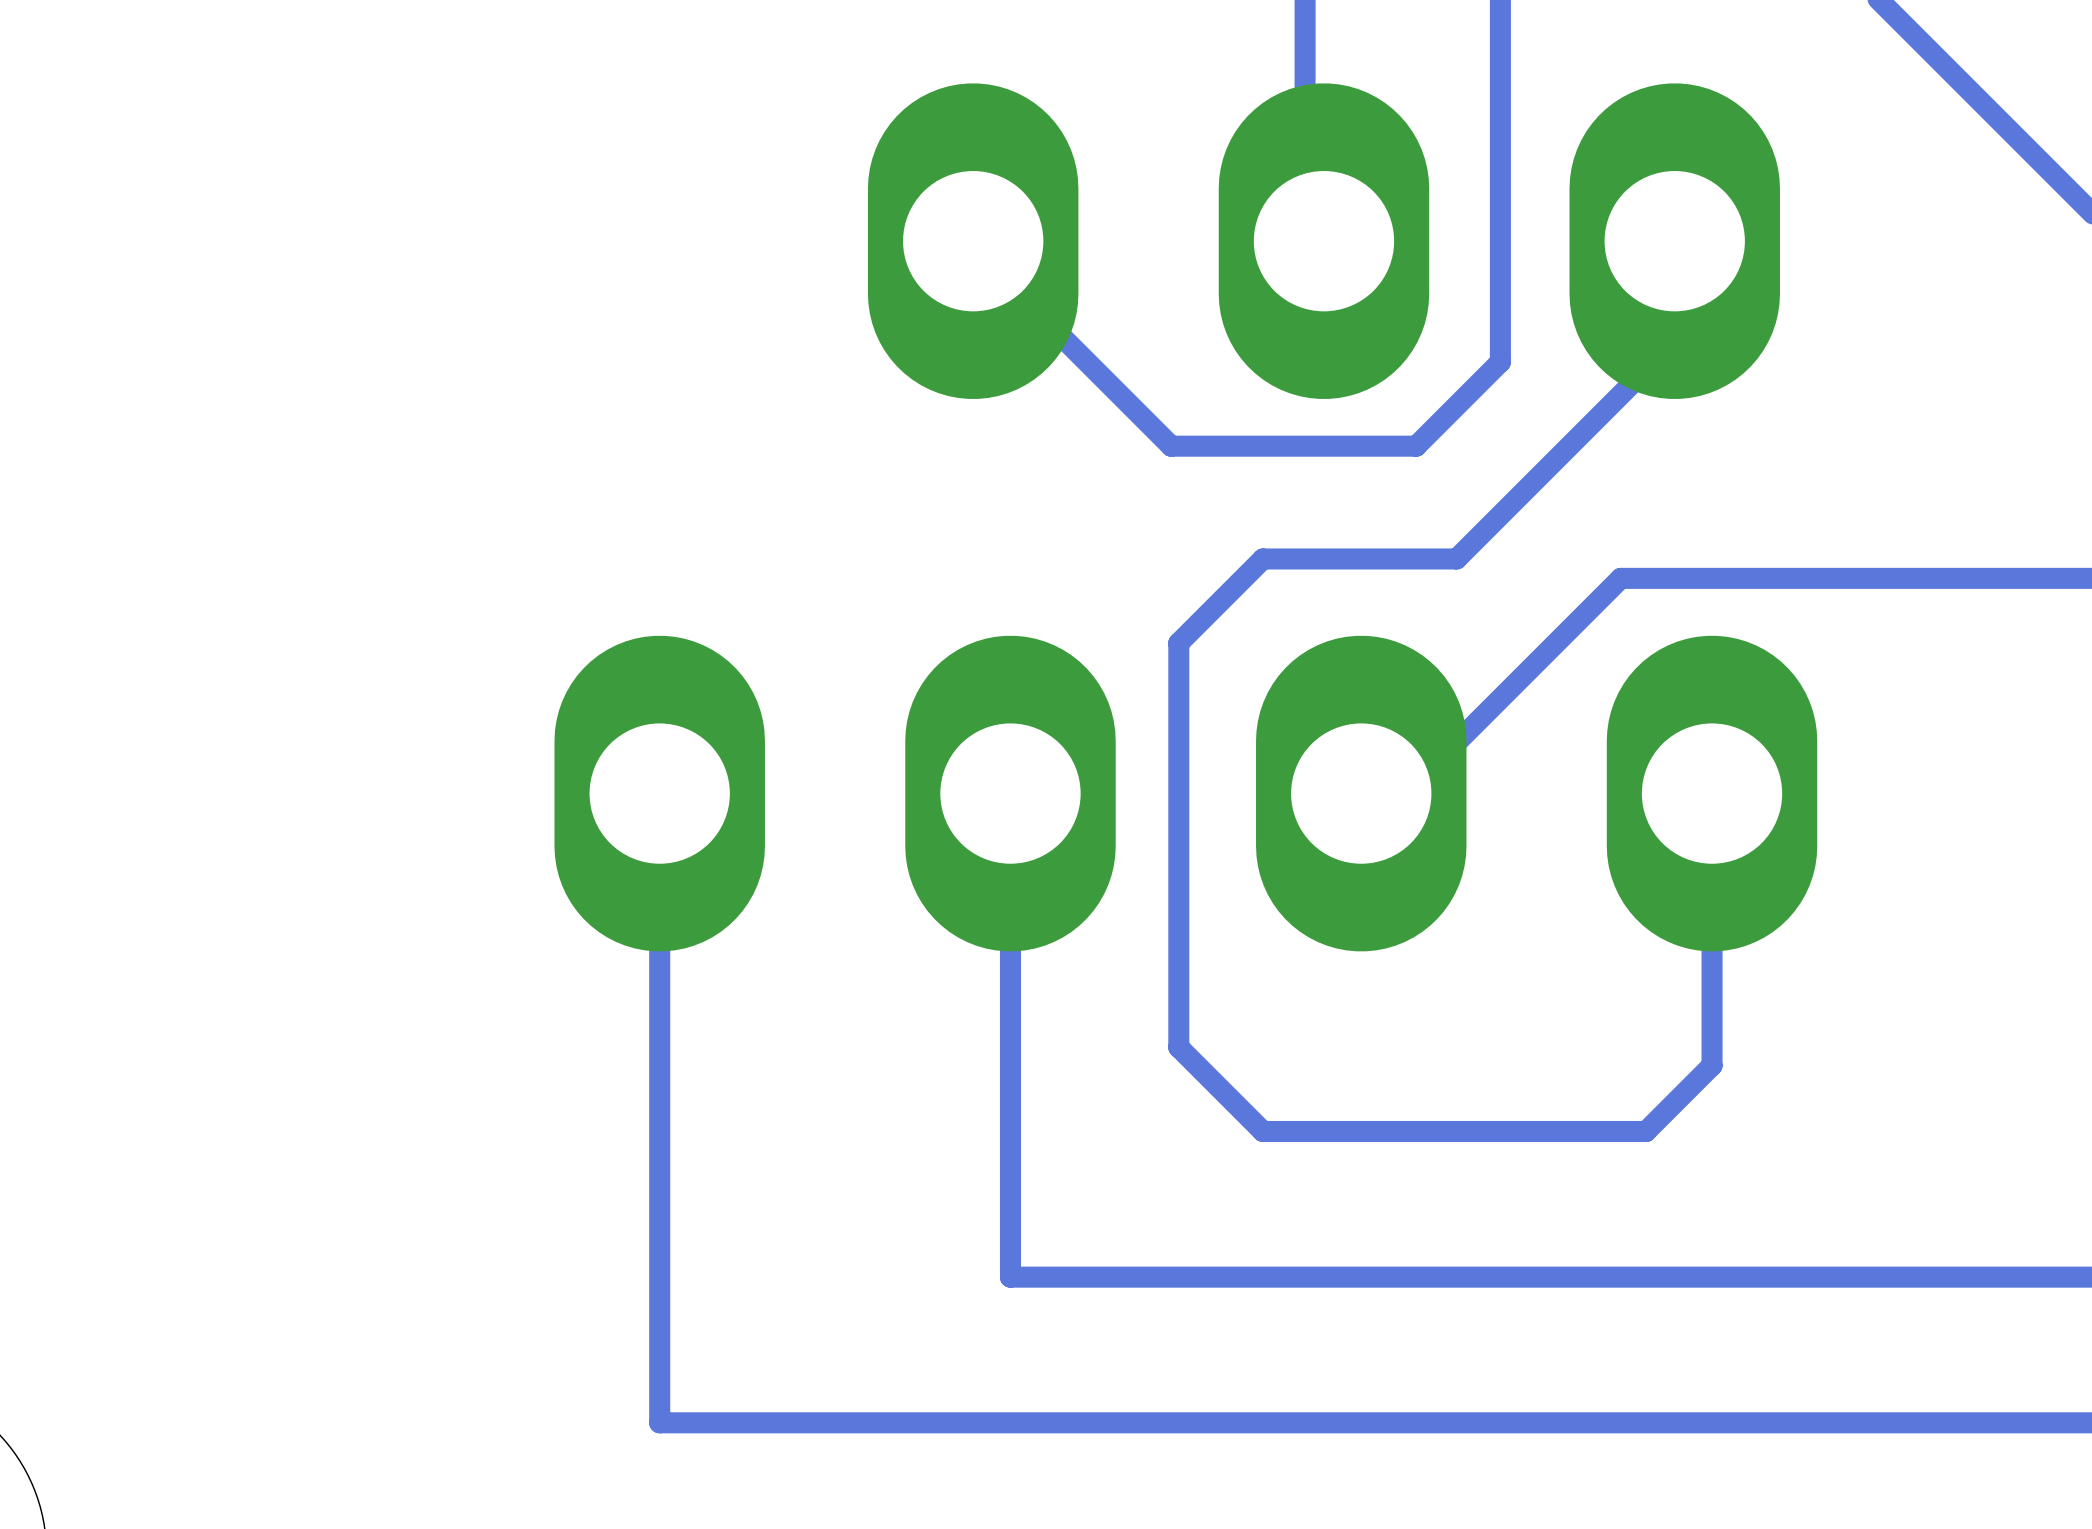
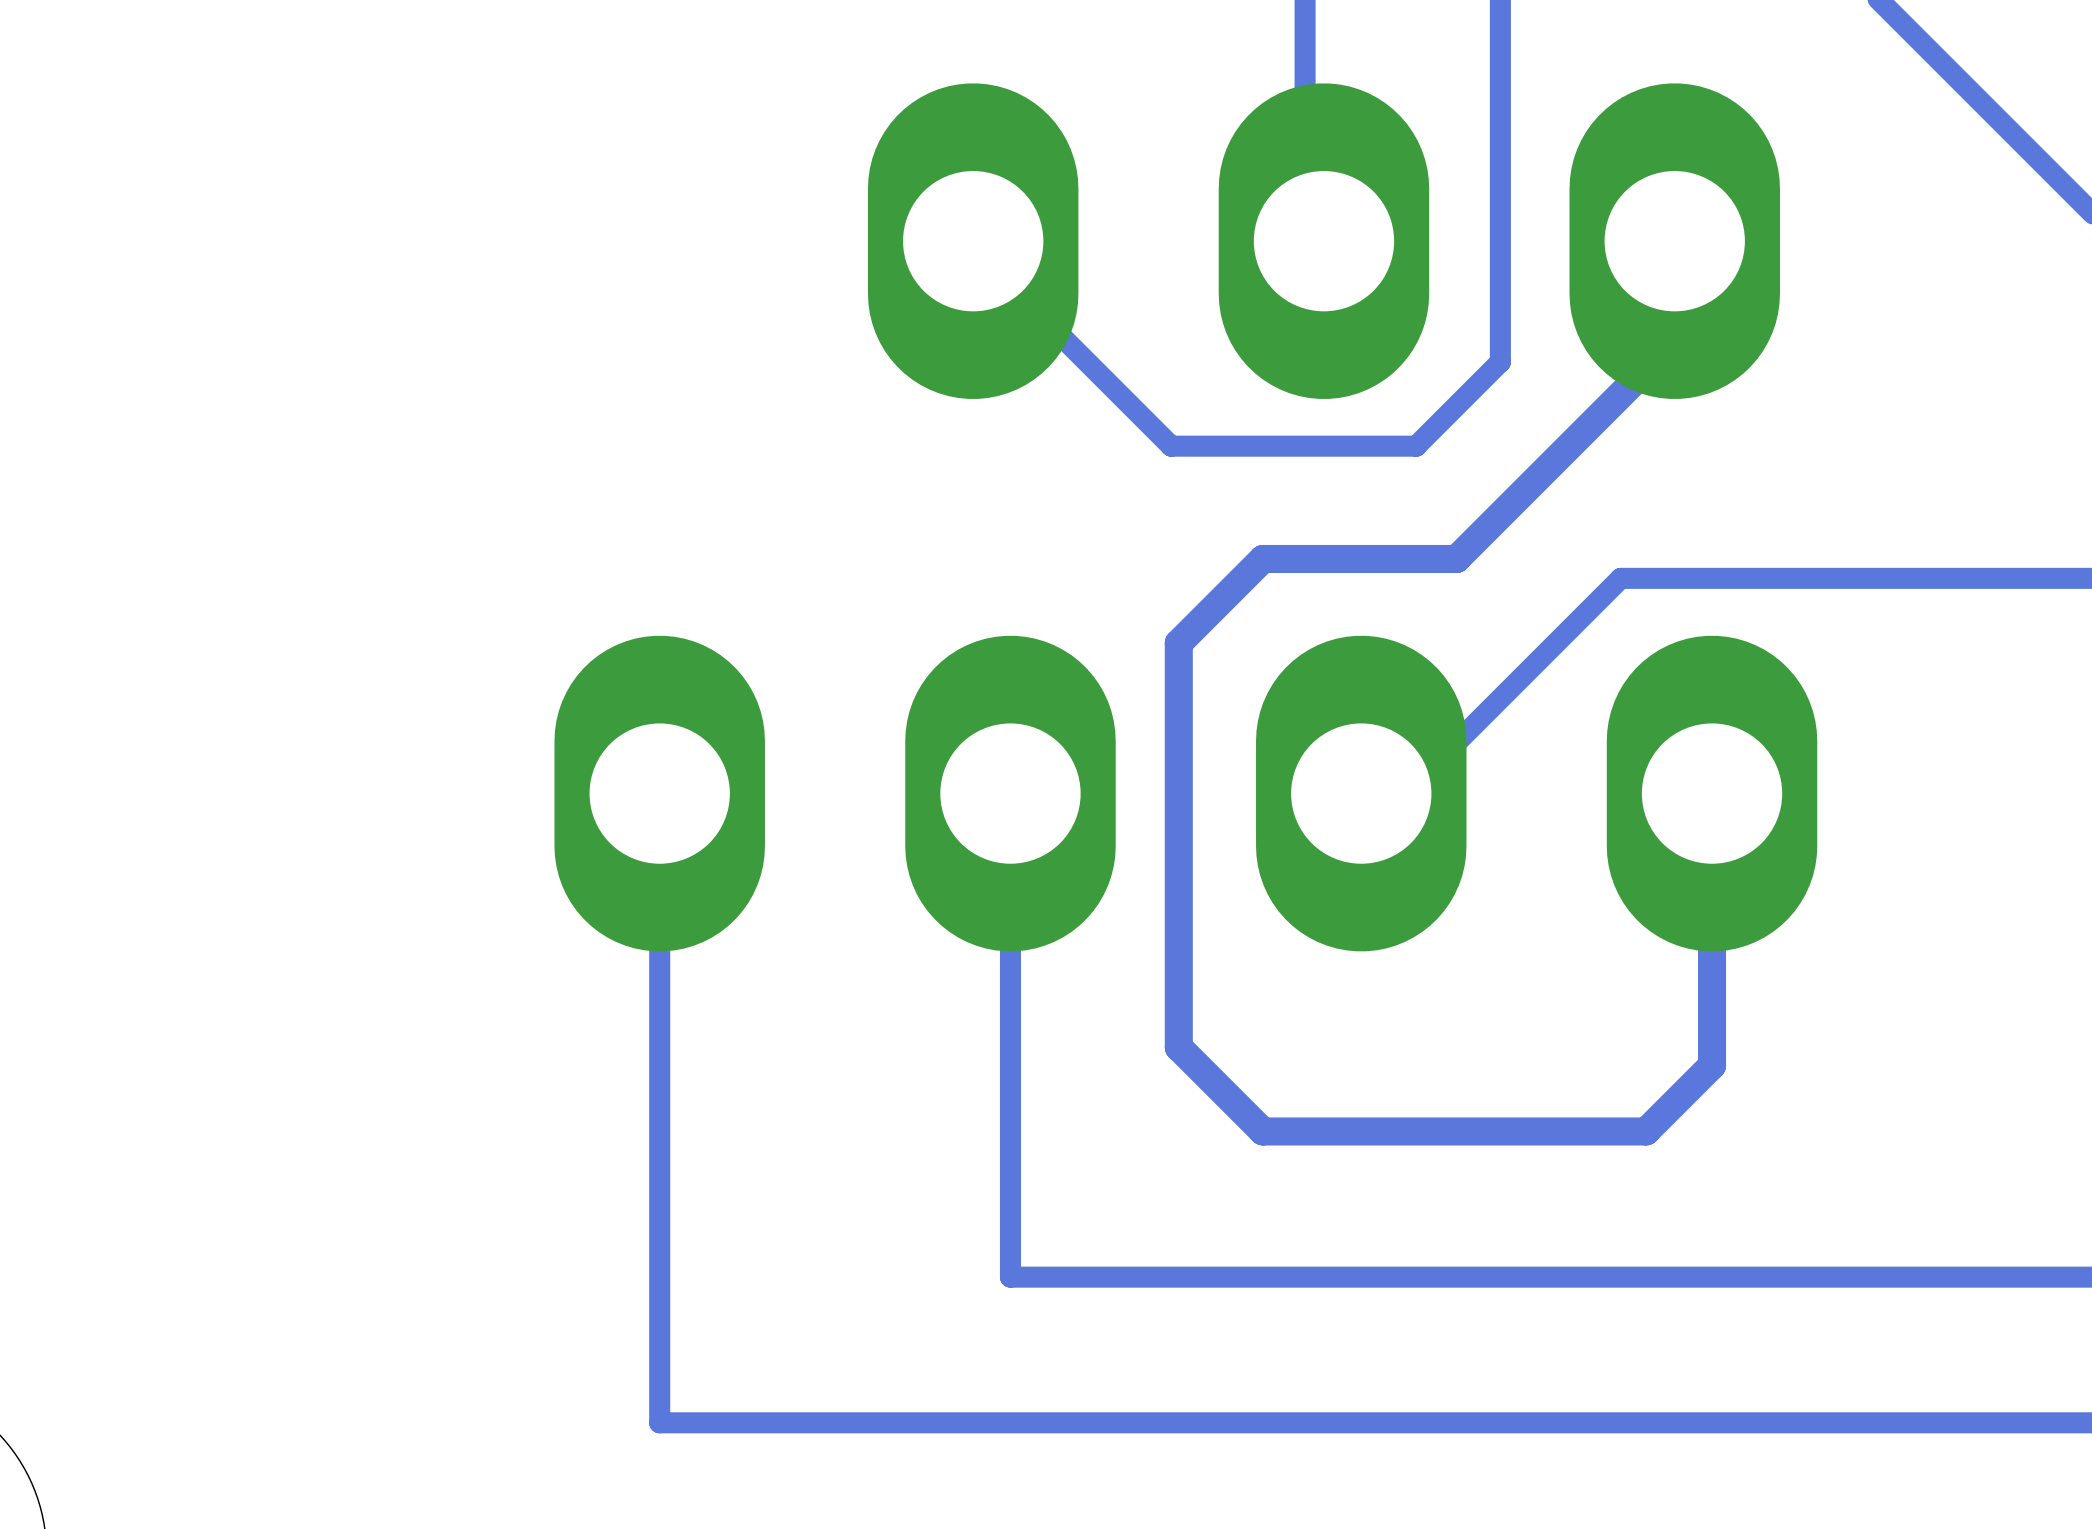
track width: thin (1674, 241) (1674, 340) (1456, 558) (1262, 558) (1178, 643) (1178, 1047) (1262, 1131) (1646, 1131) (1712, 1065) (1712, 793) -> thick (1674, 241) (1674, 340) (1456, 558) (1262, 558) (1178, 643) (1178, 1047) (1262, 1131) (1646, 1131) (1712, 1065) (1712, 793)

